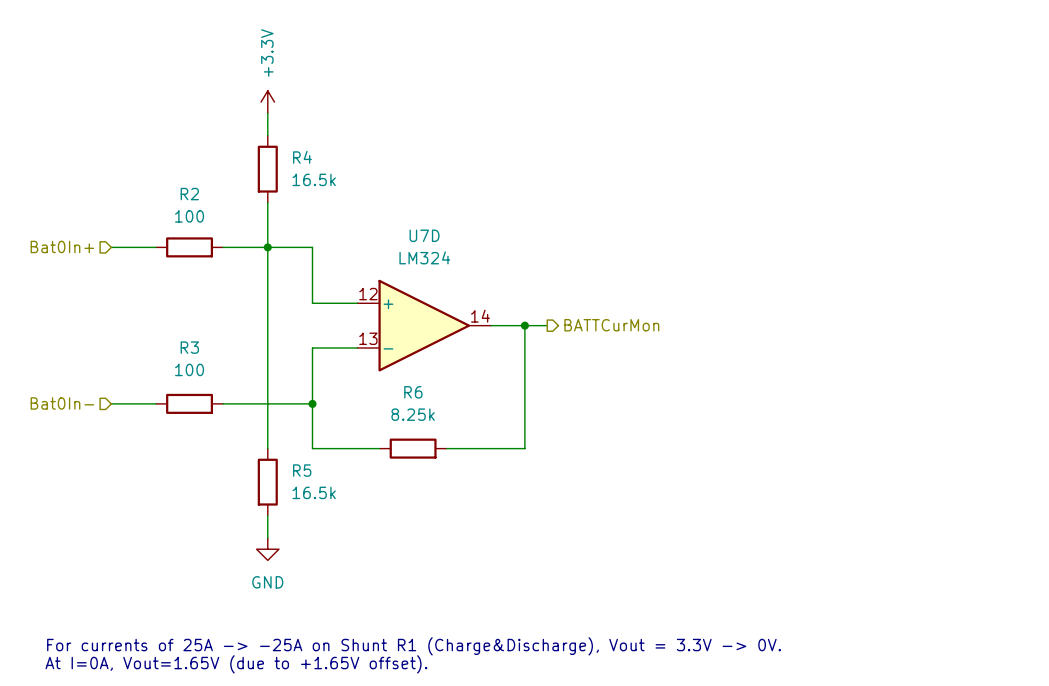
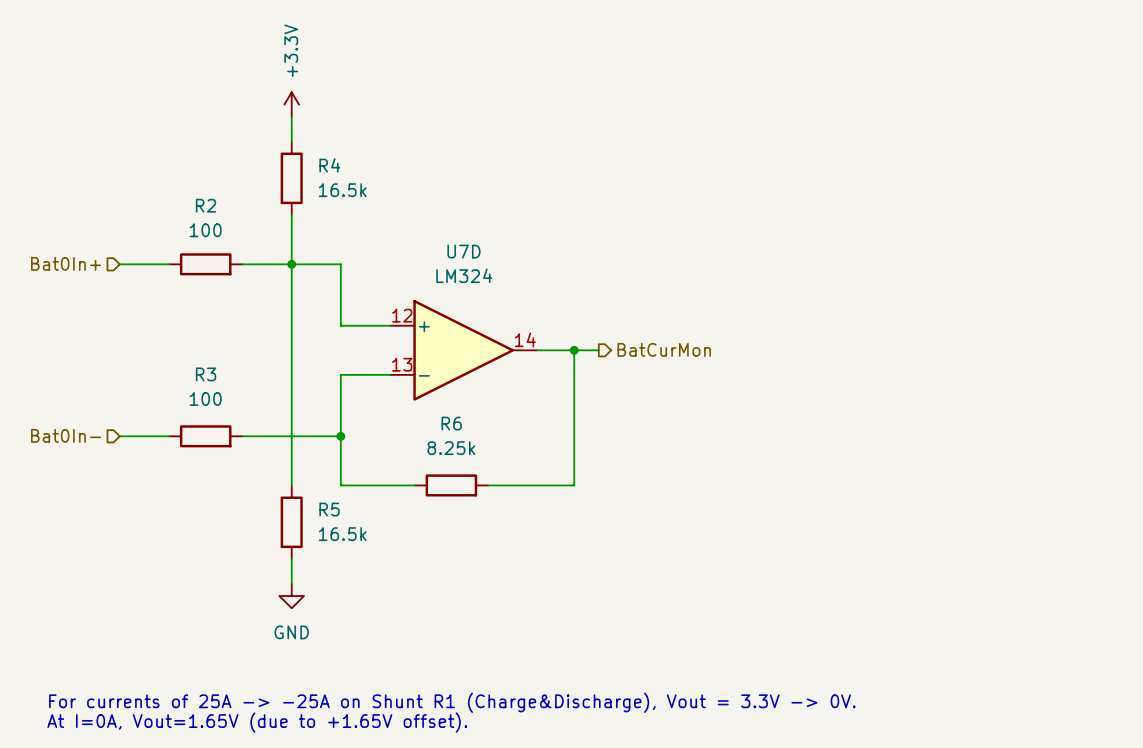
hierarchical label: BATTCurMon (611, 325) -> BatCurMon (664, 349)

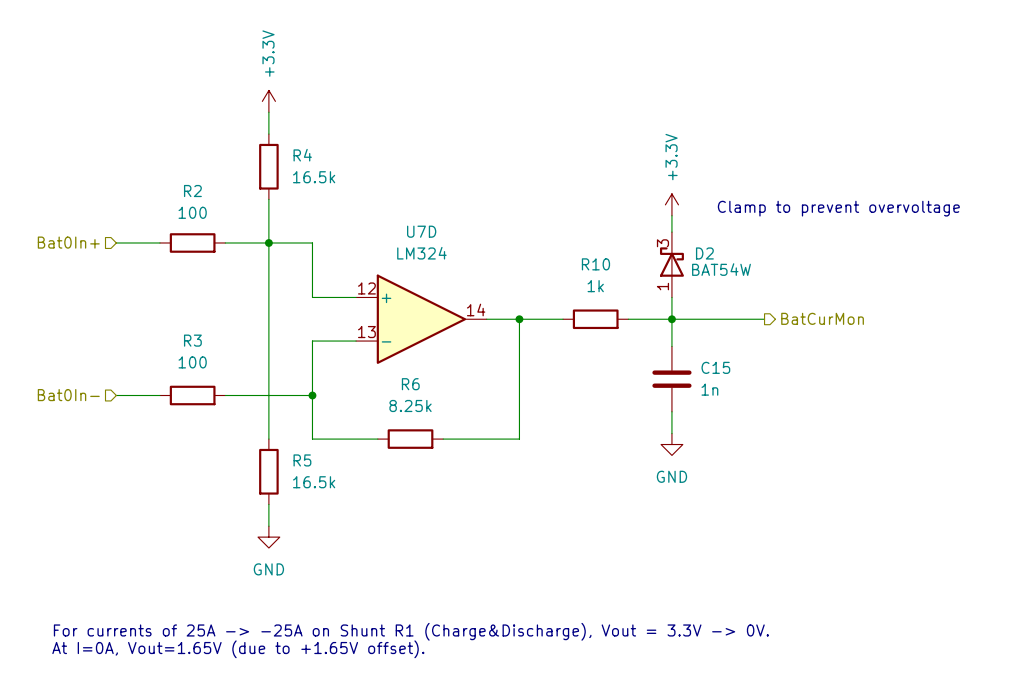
power symbol: none -> +3.3V (671, 204)
text: none -> Clamp to prevent overvoltage (838, 208)
wire: none -> (671, 215) (671, 232)
D2: none -> BAT54W (671, 264)
wire: none -> (671, 297) (671, 346)
hierarchical label: BatCurMon (664, 349) -> none
hierarchical label: none -> BatCurMon (822, 318)
wire: none -> (541, 319) (563, 319)
R10: none -> 1k (595, 319)
wire: none -> (628, 319) (764, 319)
junction: none -> (671, 319)
C15: none -> 1n (671, 379)
wire: none -> (671, 411) (671, 433)
power symbol: none -> GND (671, 444)

